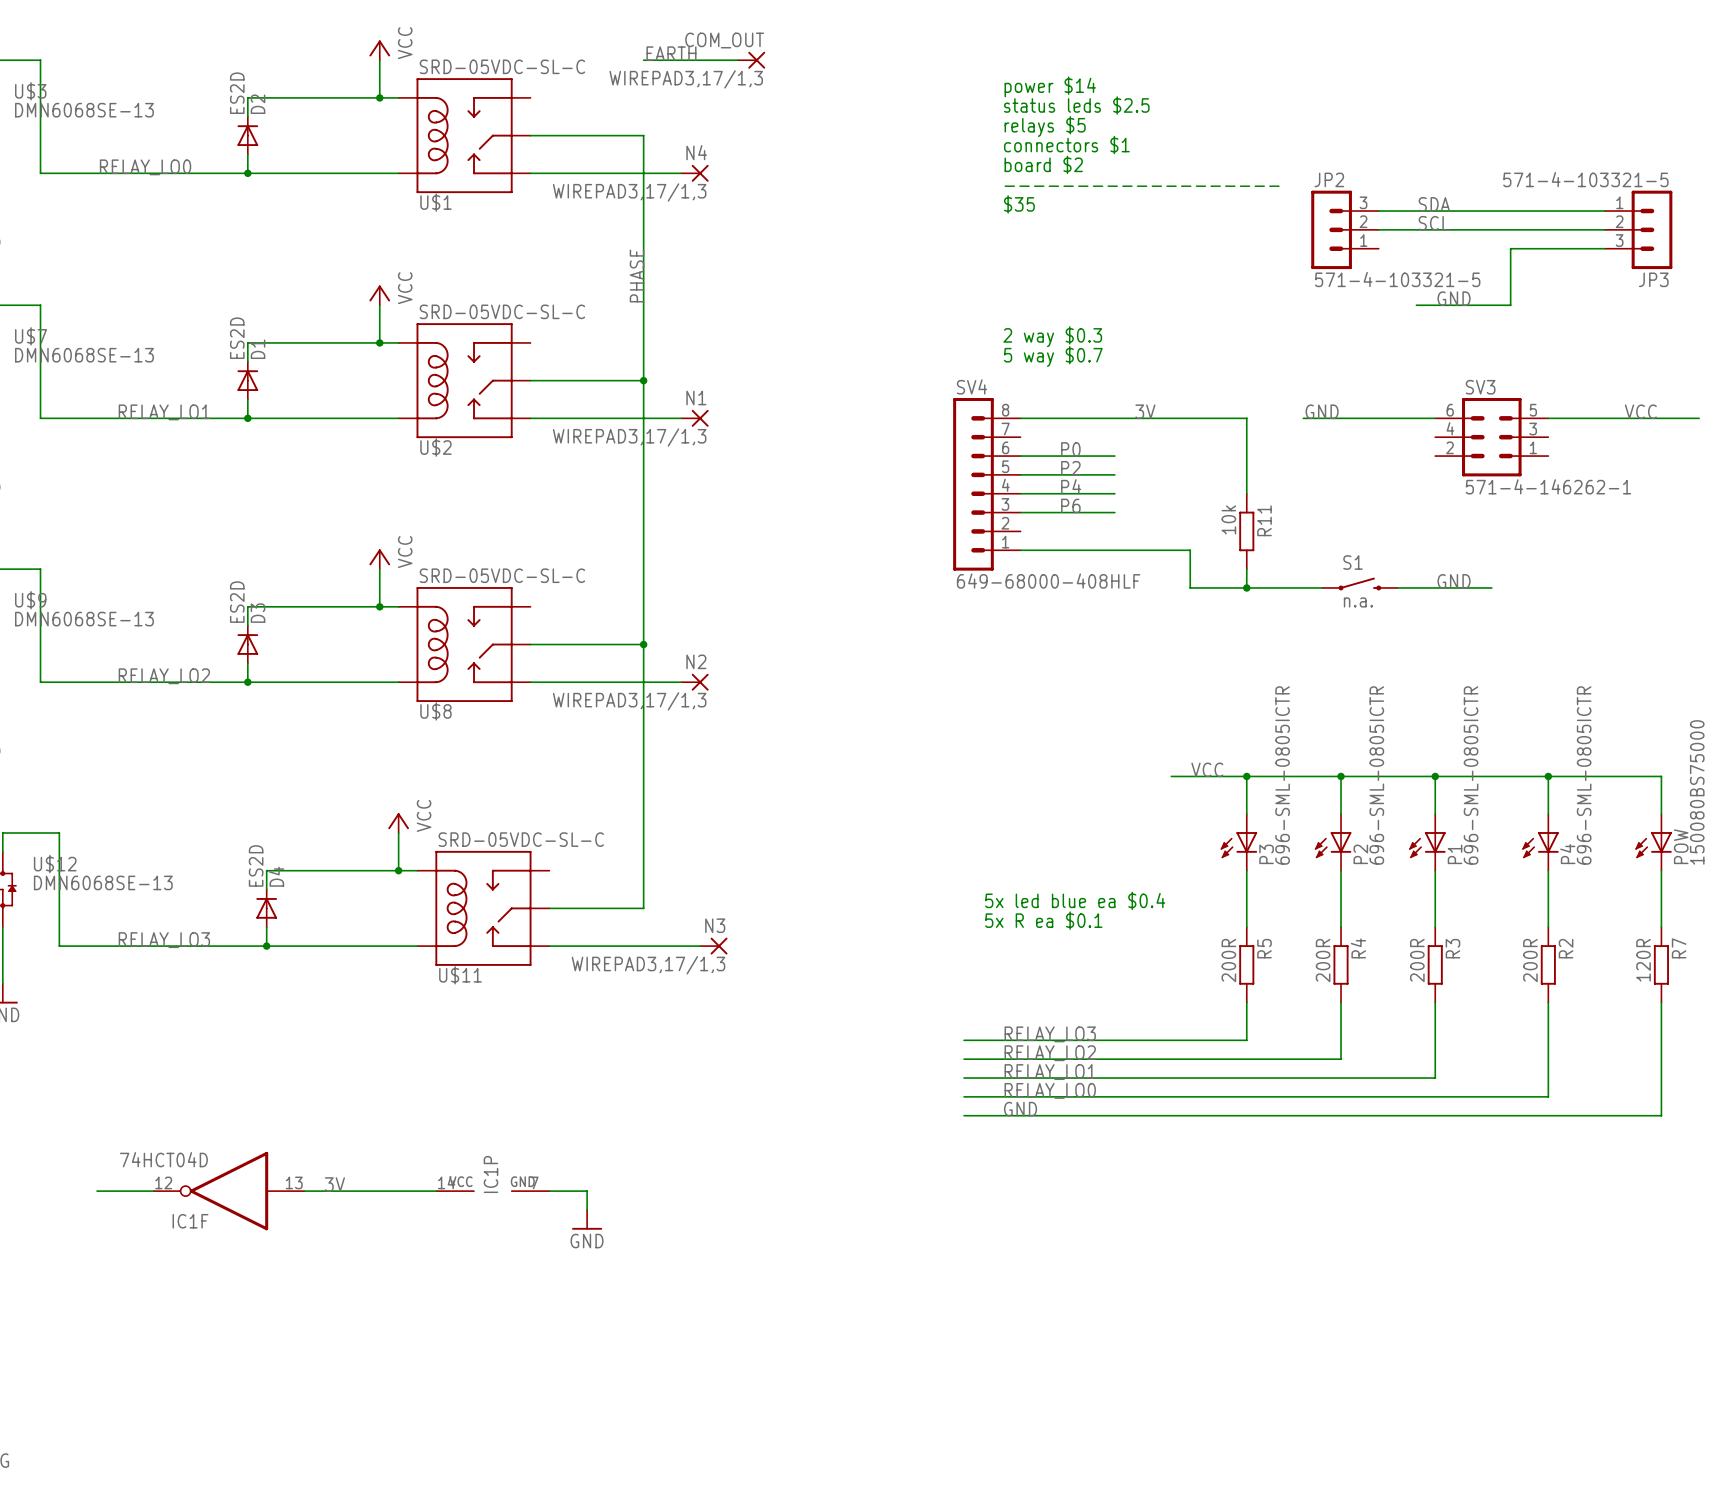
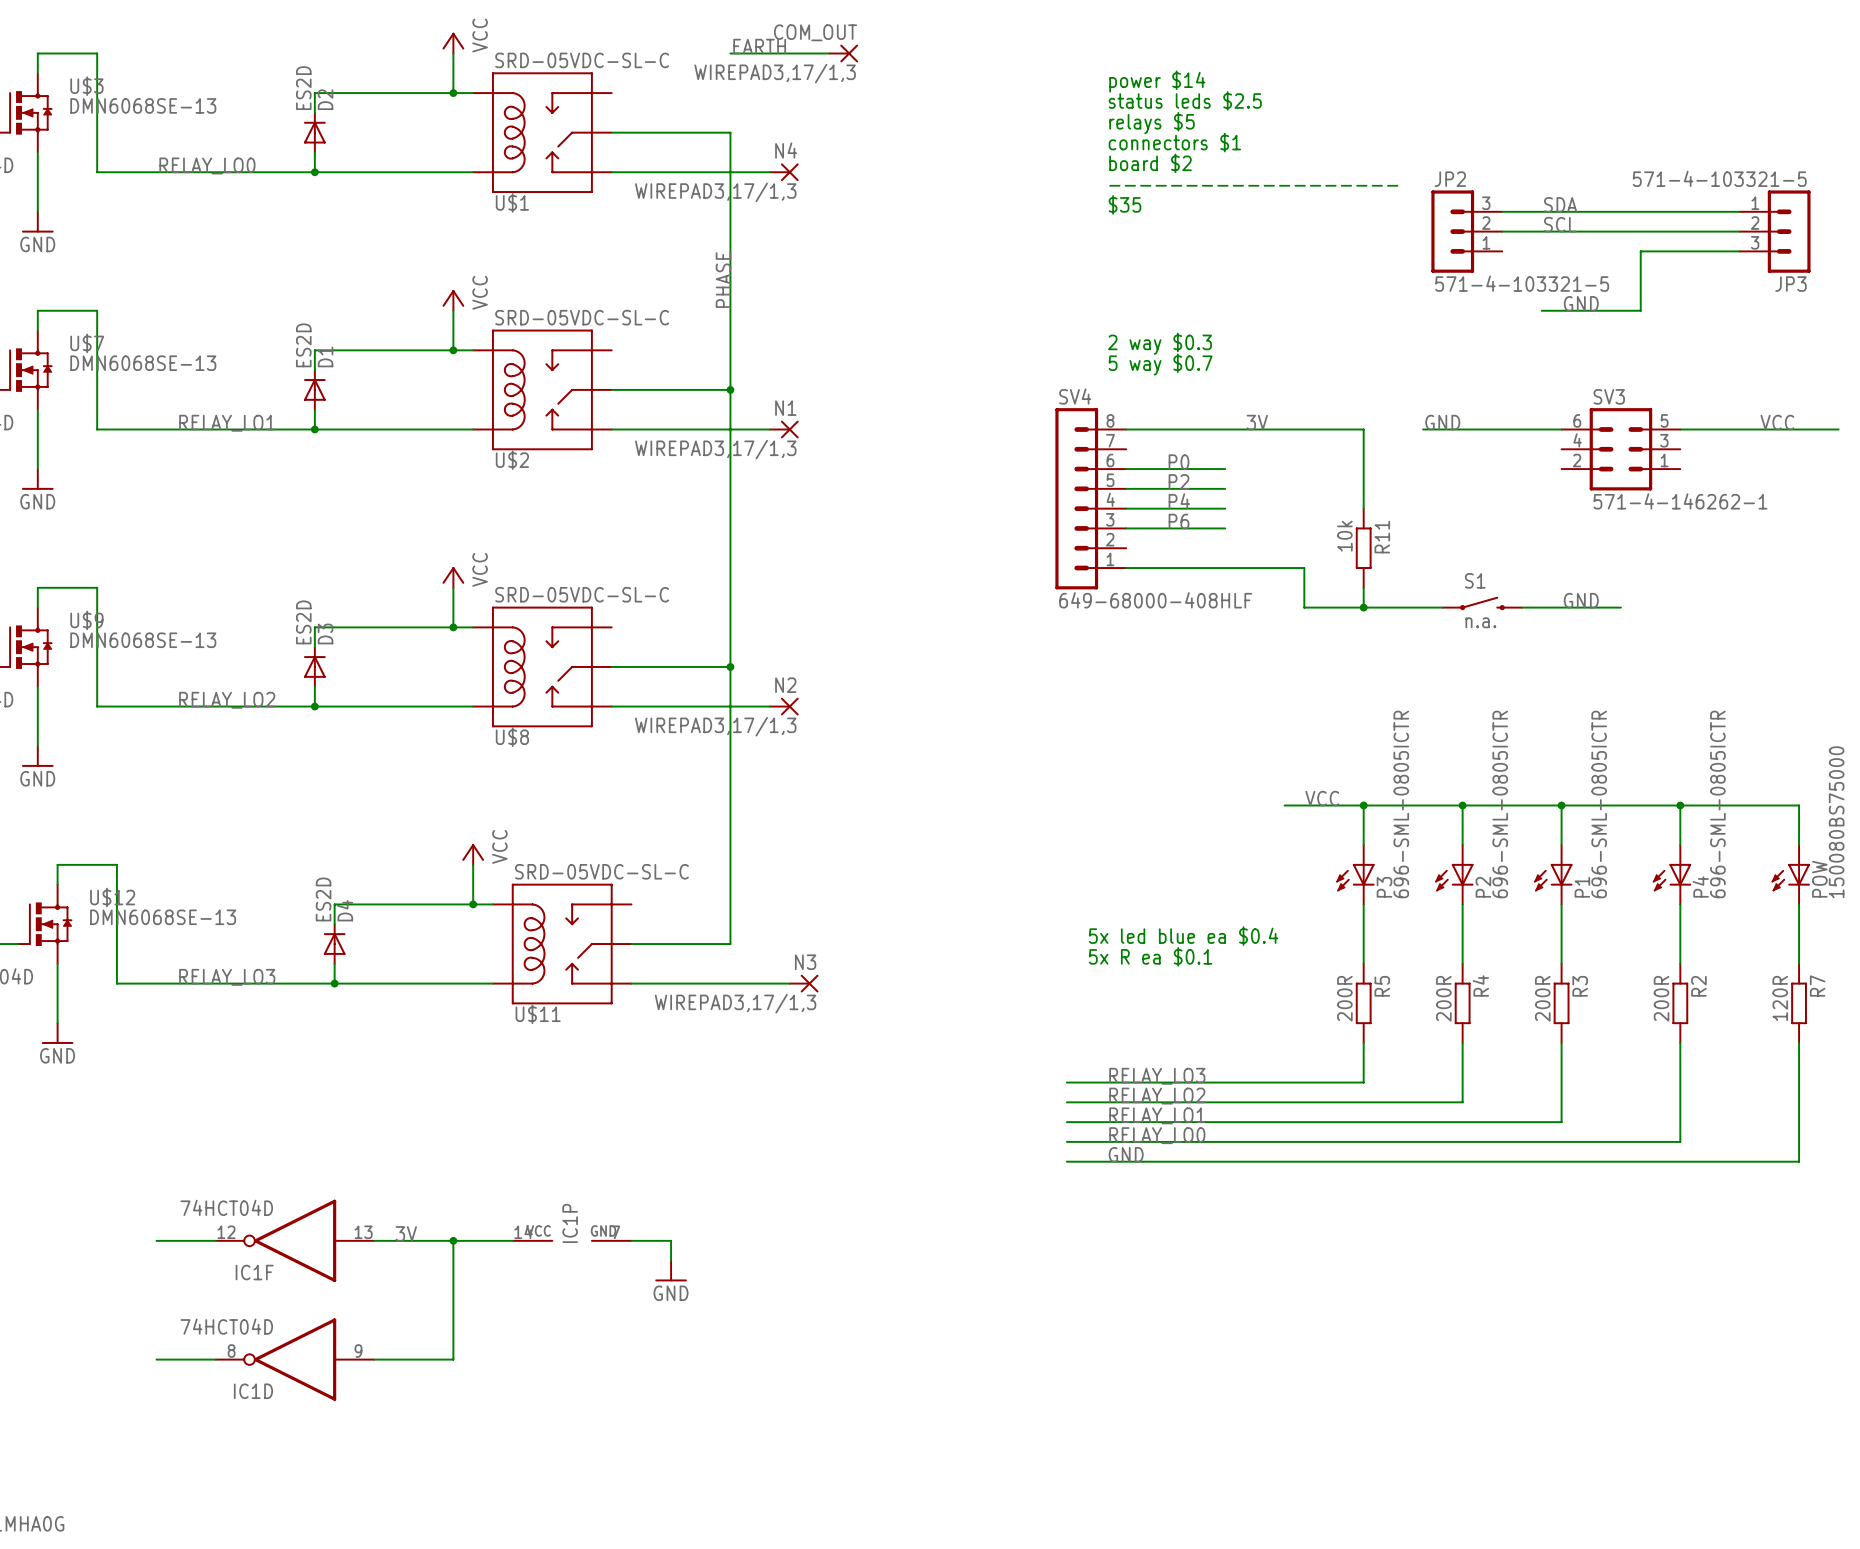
wire: none -> (453, 1240) (453, 1359) (374, 1359)
junction: none -> (453, 1240)
wire: none -> (156, 1359) (215, 1359)
IC1D: none -> 74HCT04D (295, 1359)

